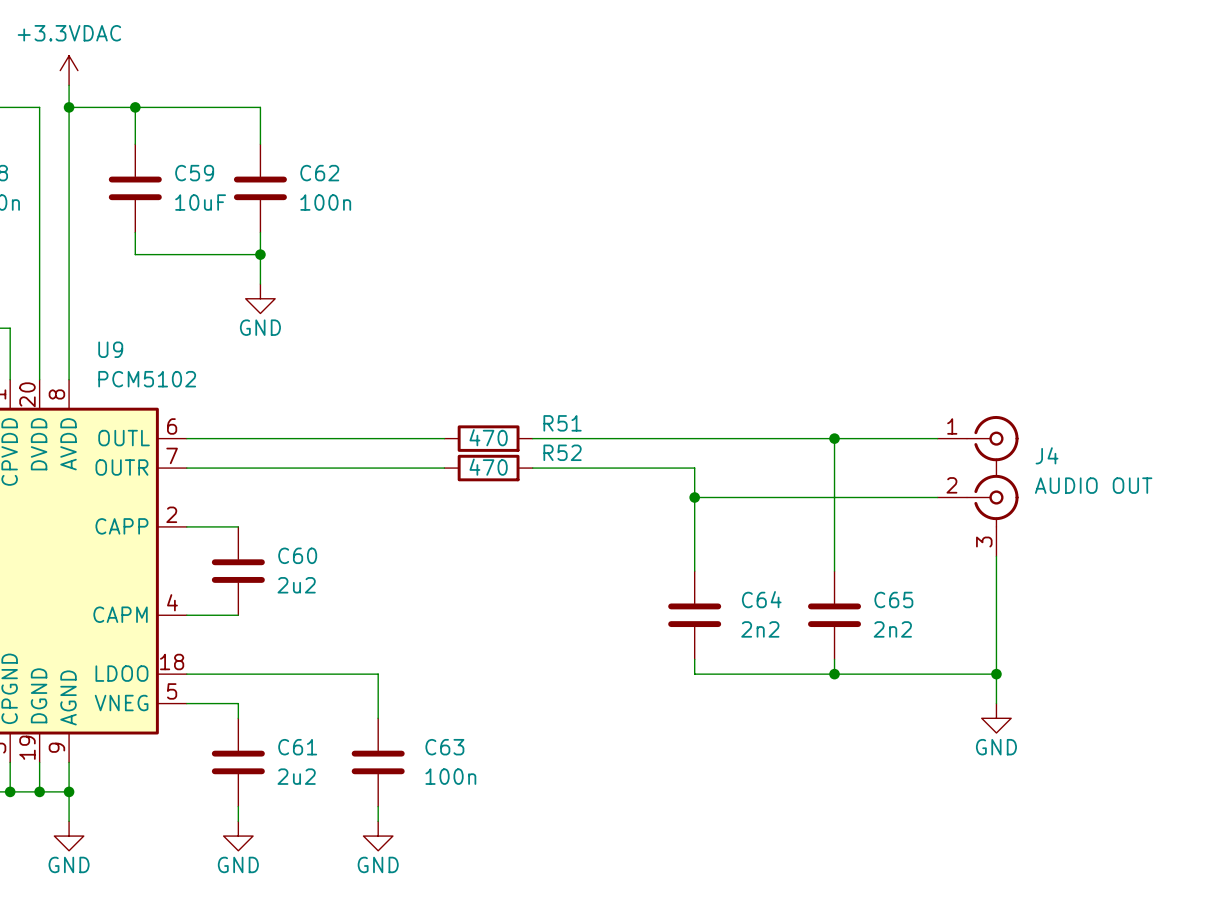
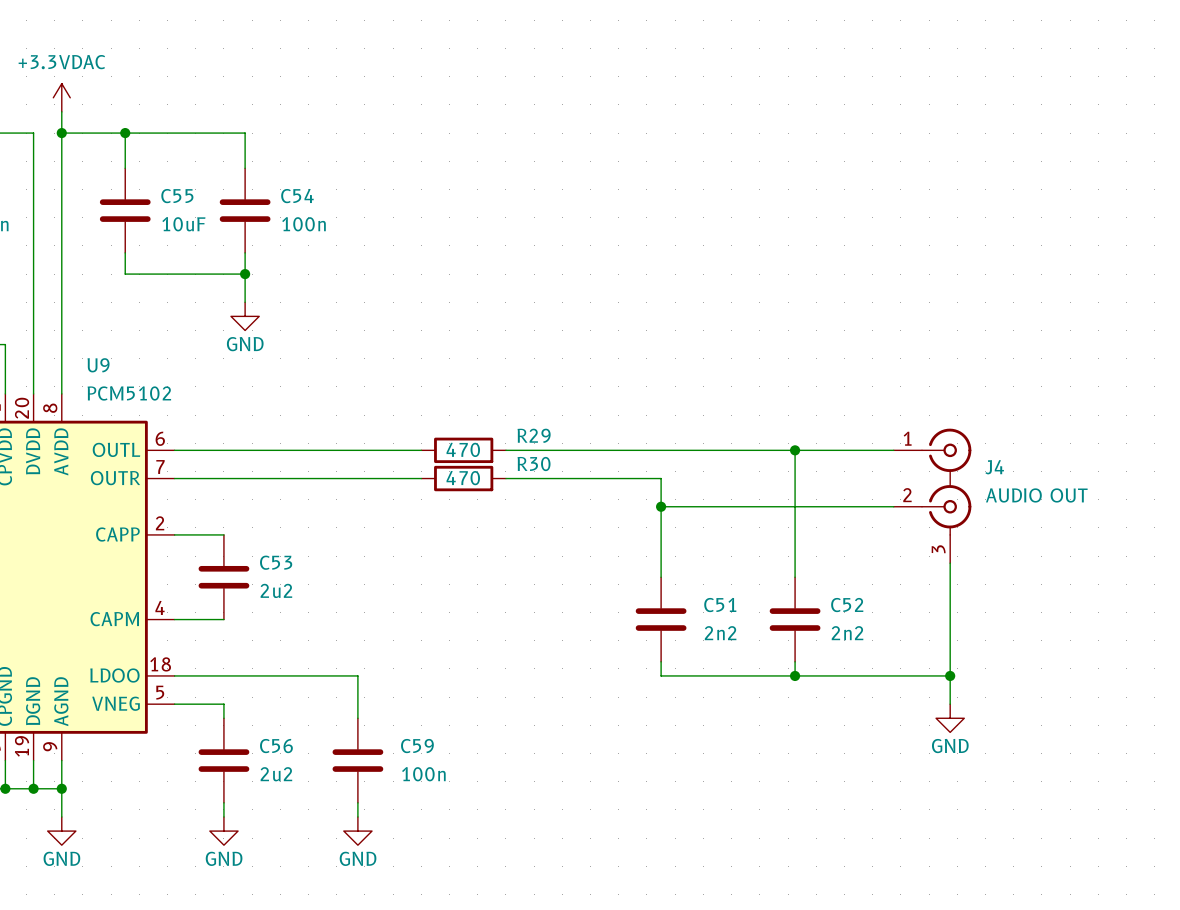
C59 name: C59 (194, 173) -> C55 (177, 196)
C62 name: C62 (319, 173) -> C54 (297, 196)
R51 name: R51 (562, 423) -> R29 (534, 435)
R52 name: R52 (562, 452) -> R30 (534, 464)
C60 name: C60 (297, 555) -> C53 (276, 562)
C64 name: C64 (761, 599) -> C51 (720, 605)
C65 name: C65 (893, 599) -> C52 (847, 605)
C61 name: C61 (297, 747) -> C56 (276, 746)
C63 name: C63 (444, 747) -> C59 (417, 746)

